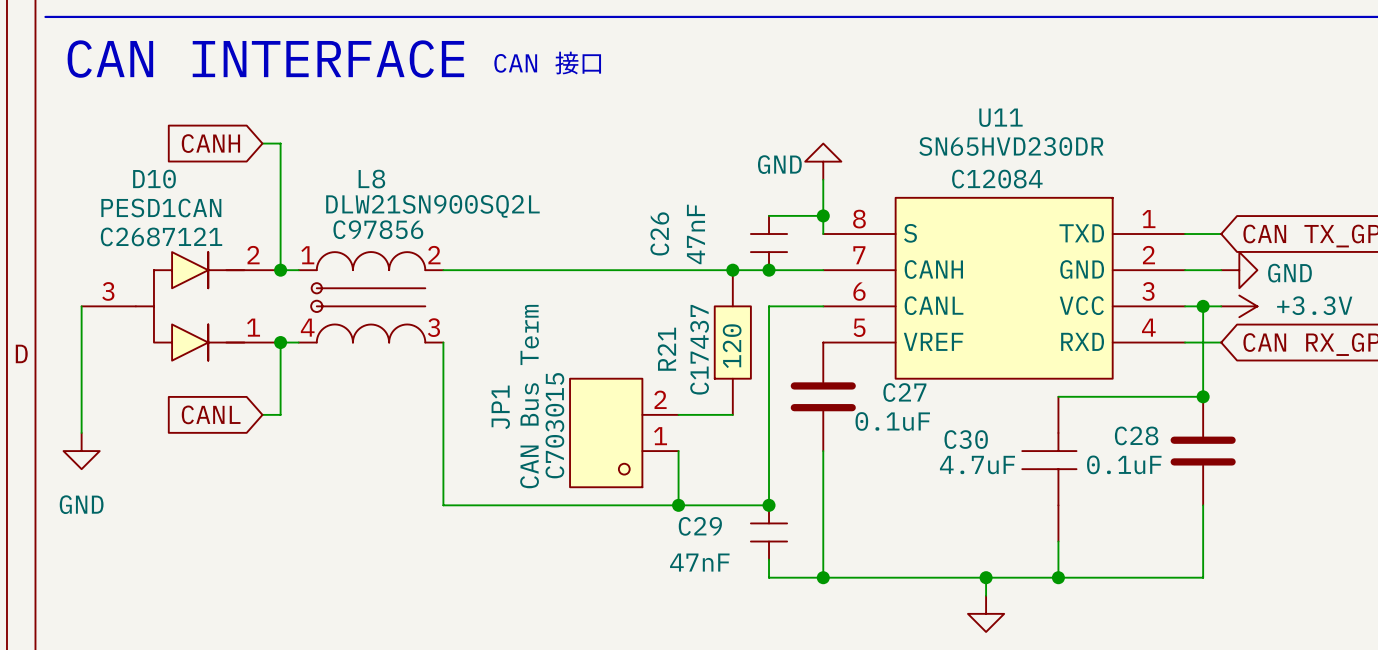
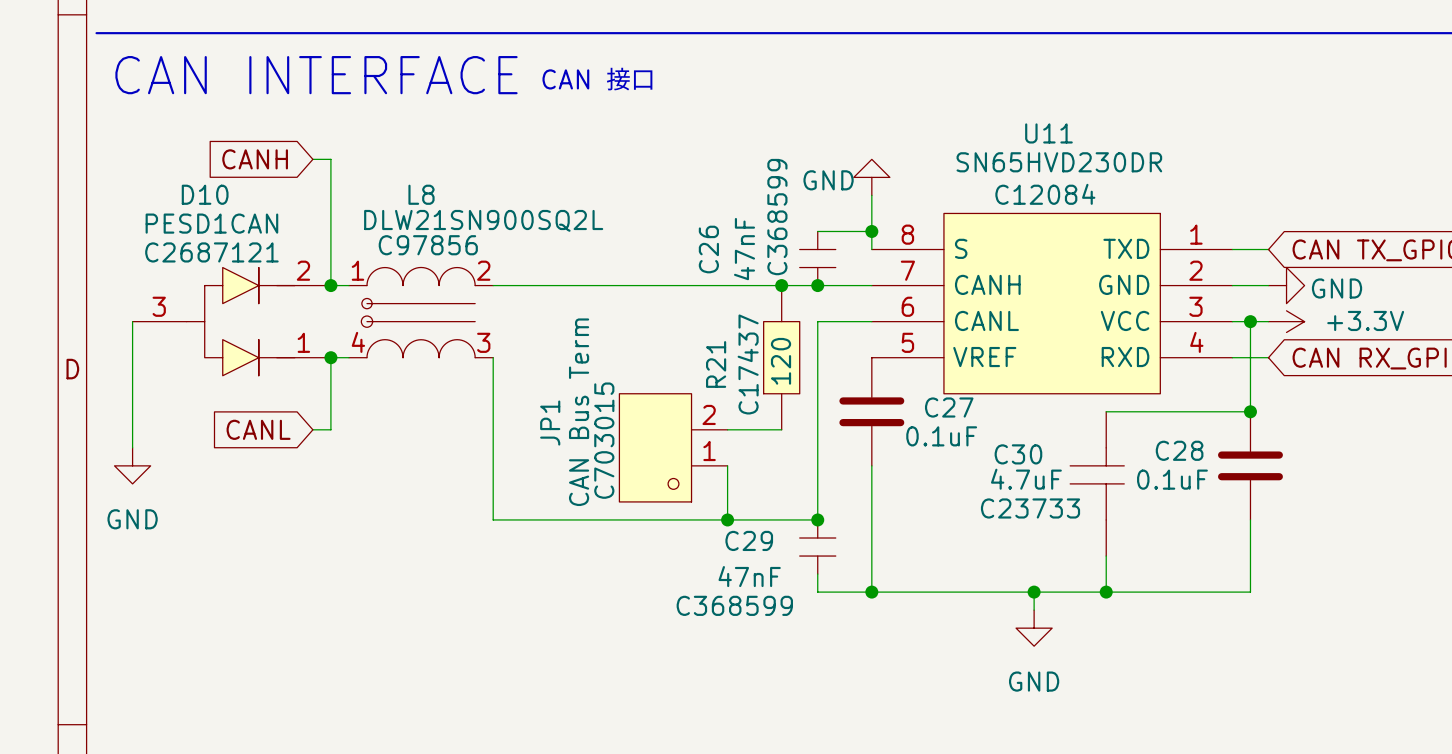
C26 text: none -> C368599 (777, 217)
C30 text: none -> C23733 (1030, 508)
C29 text: none -> C368599 (734, 605)

